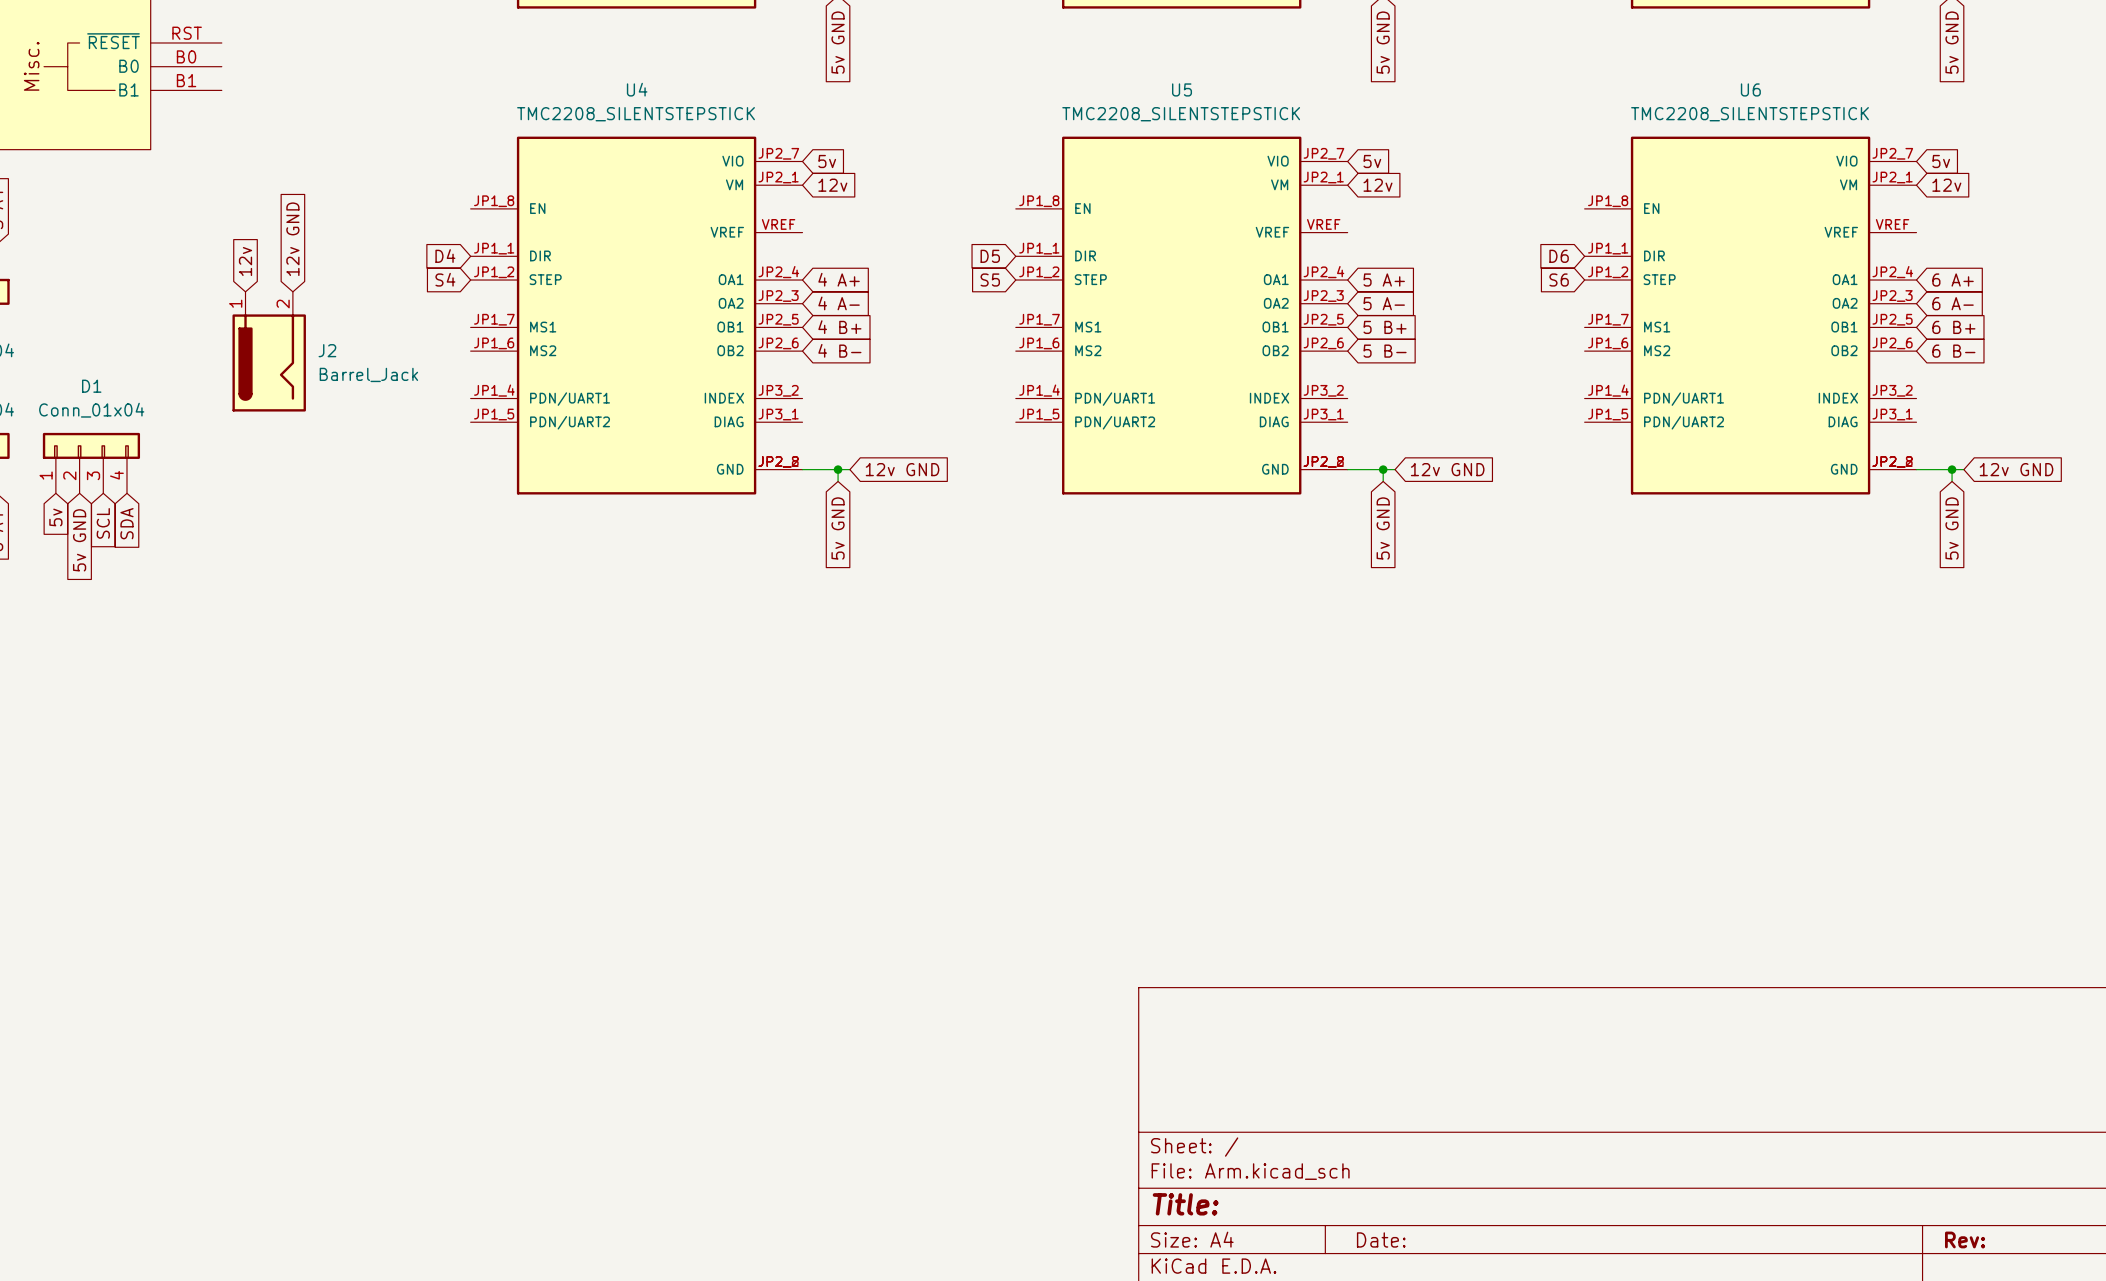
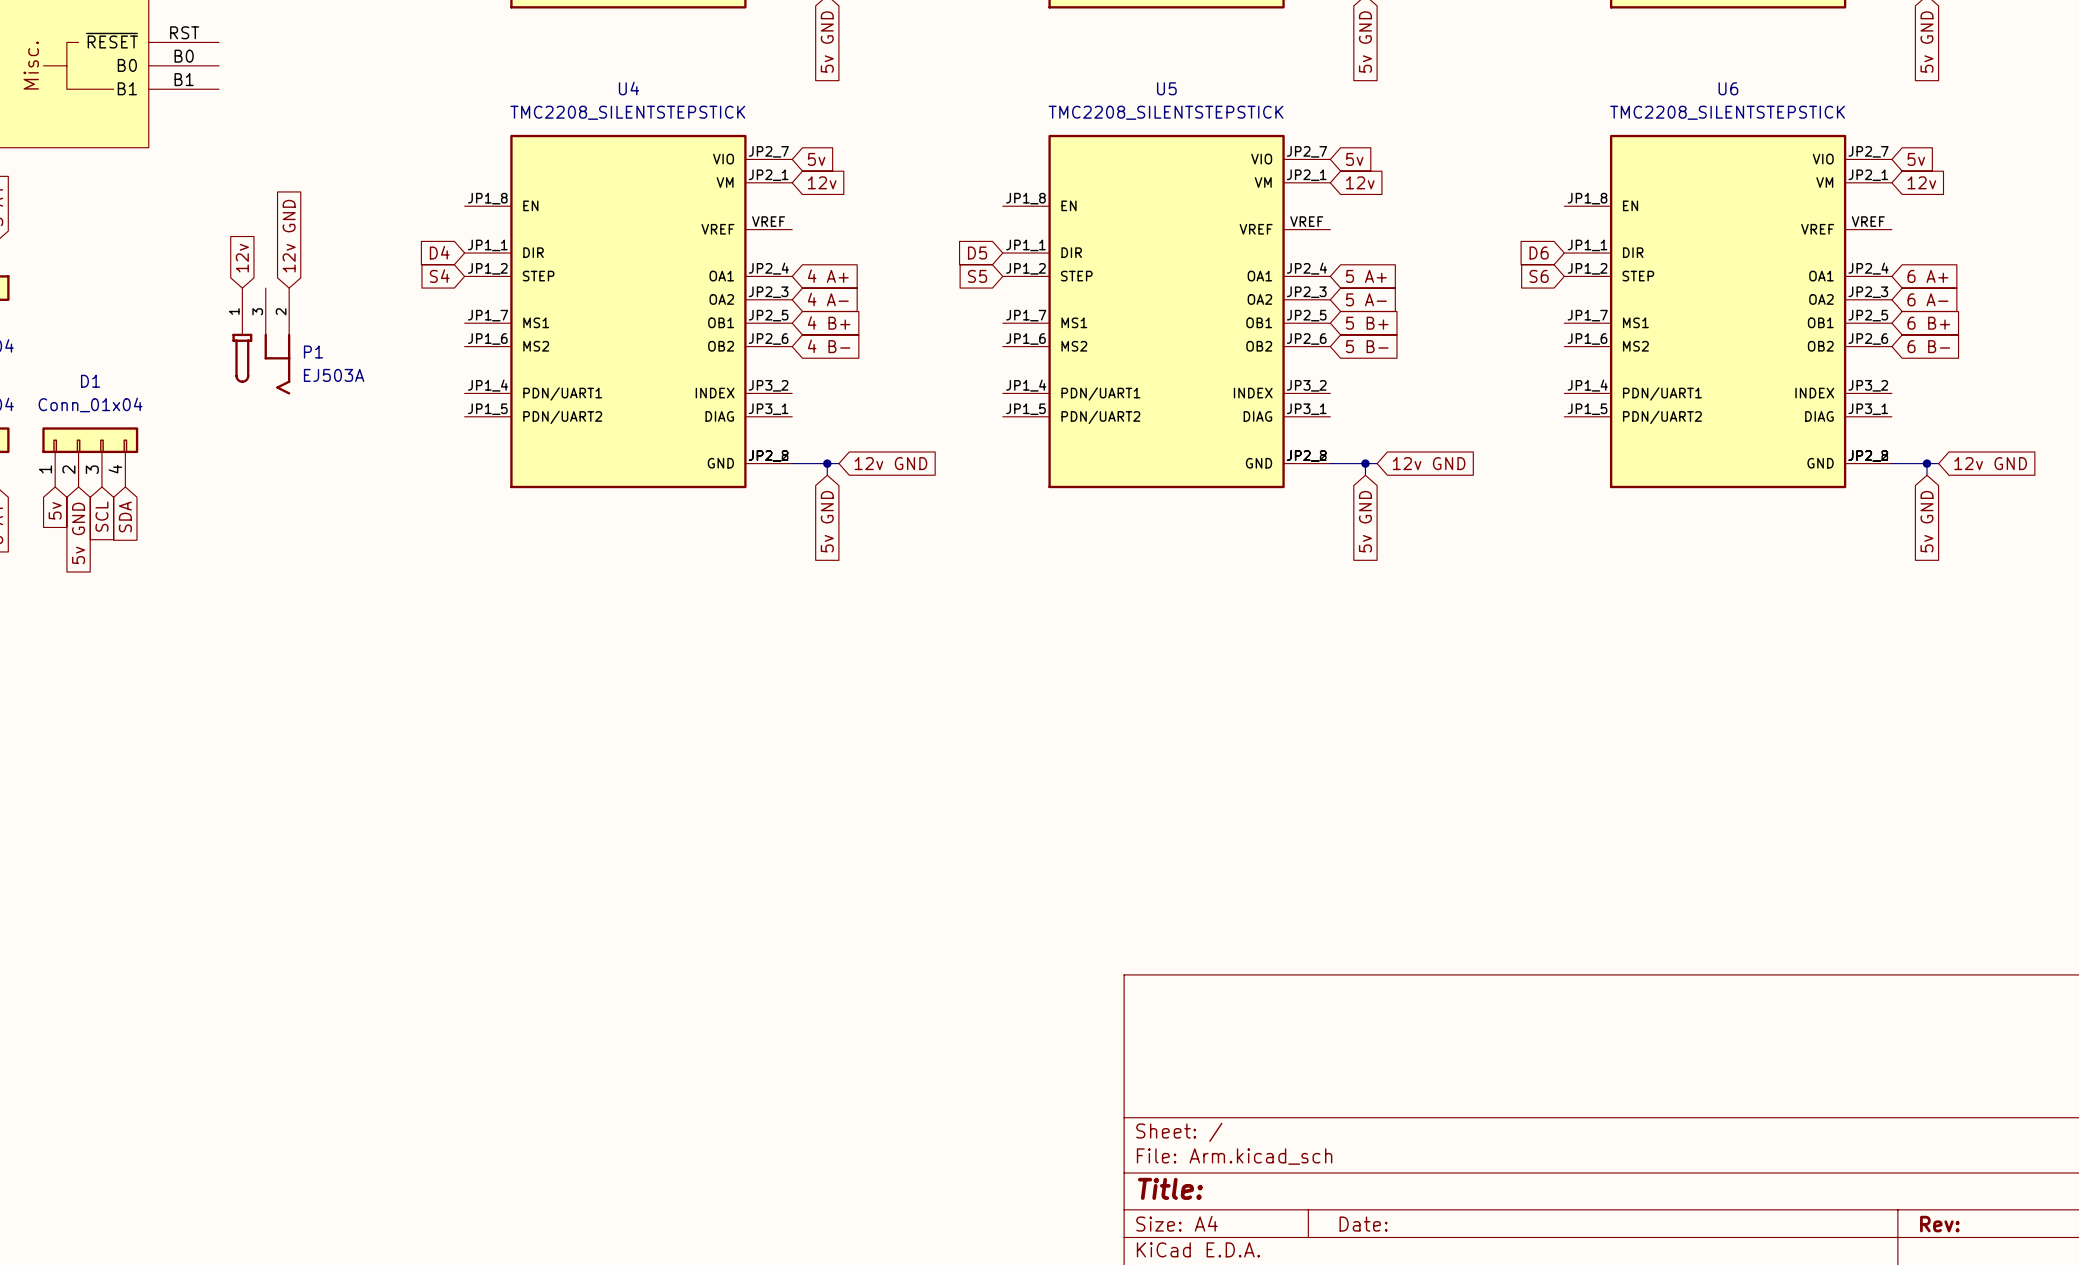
P1: none -> EJ503A (261, 341)
J2: Barrel_Jack (269, 351) -> none

